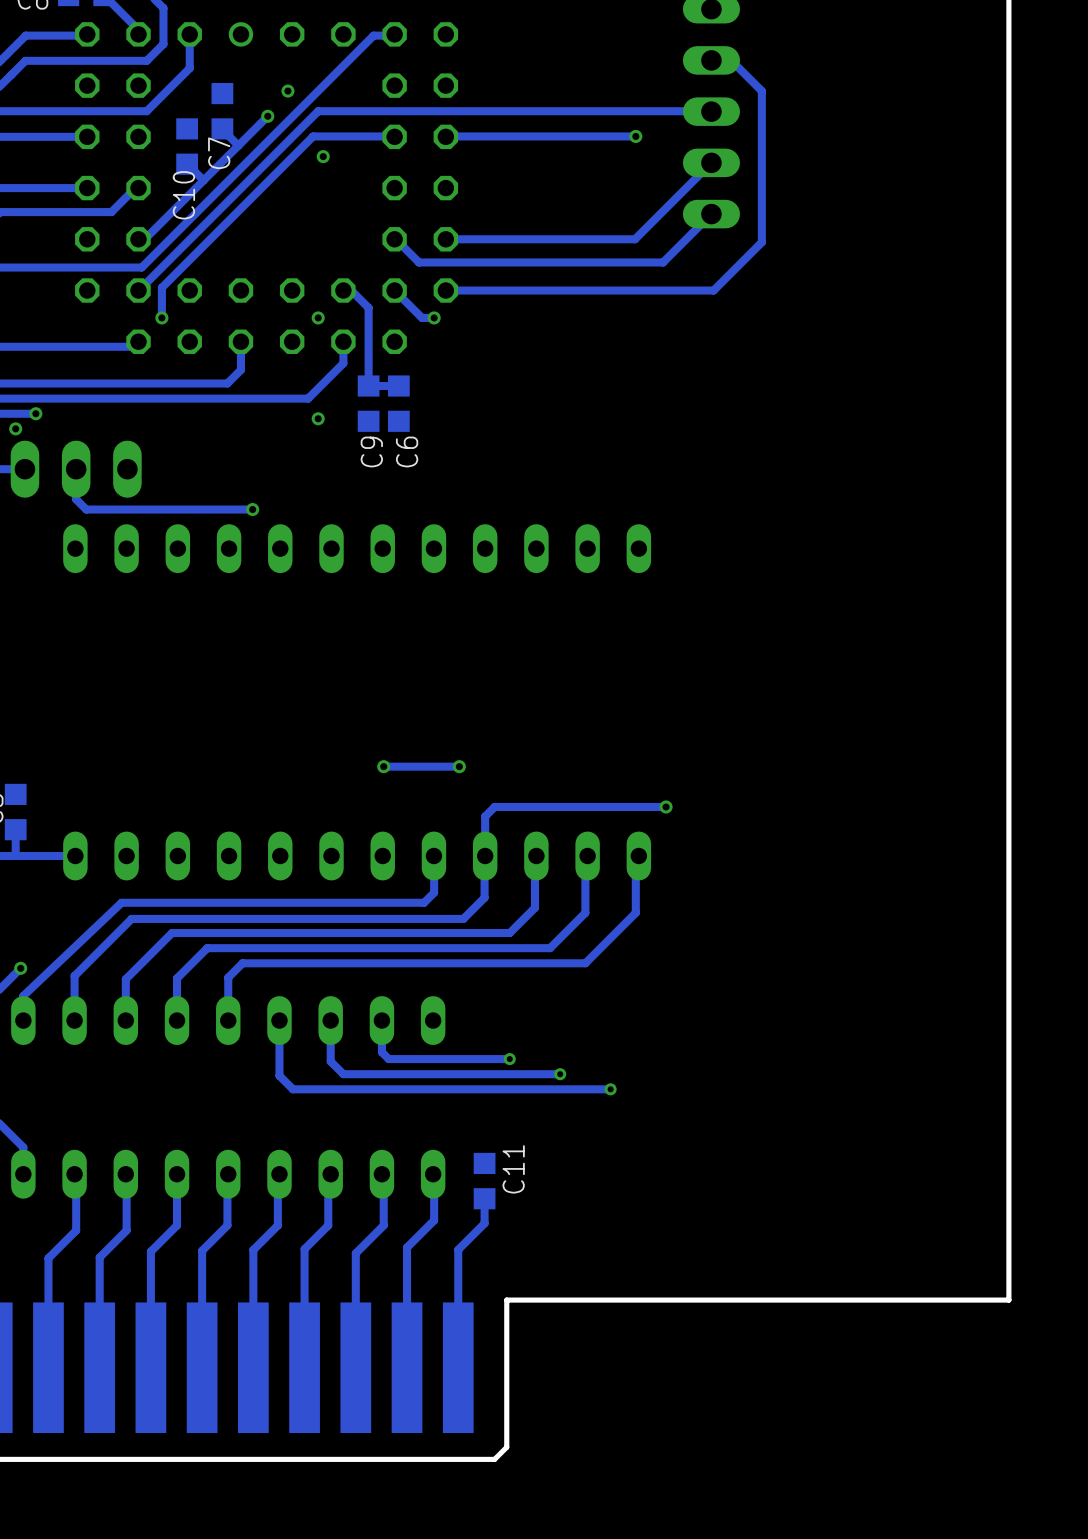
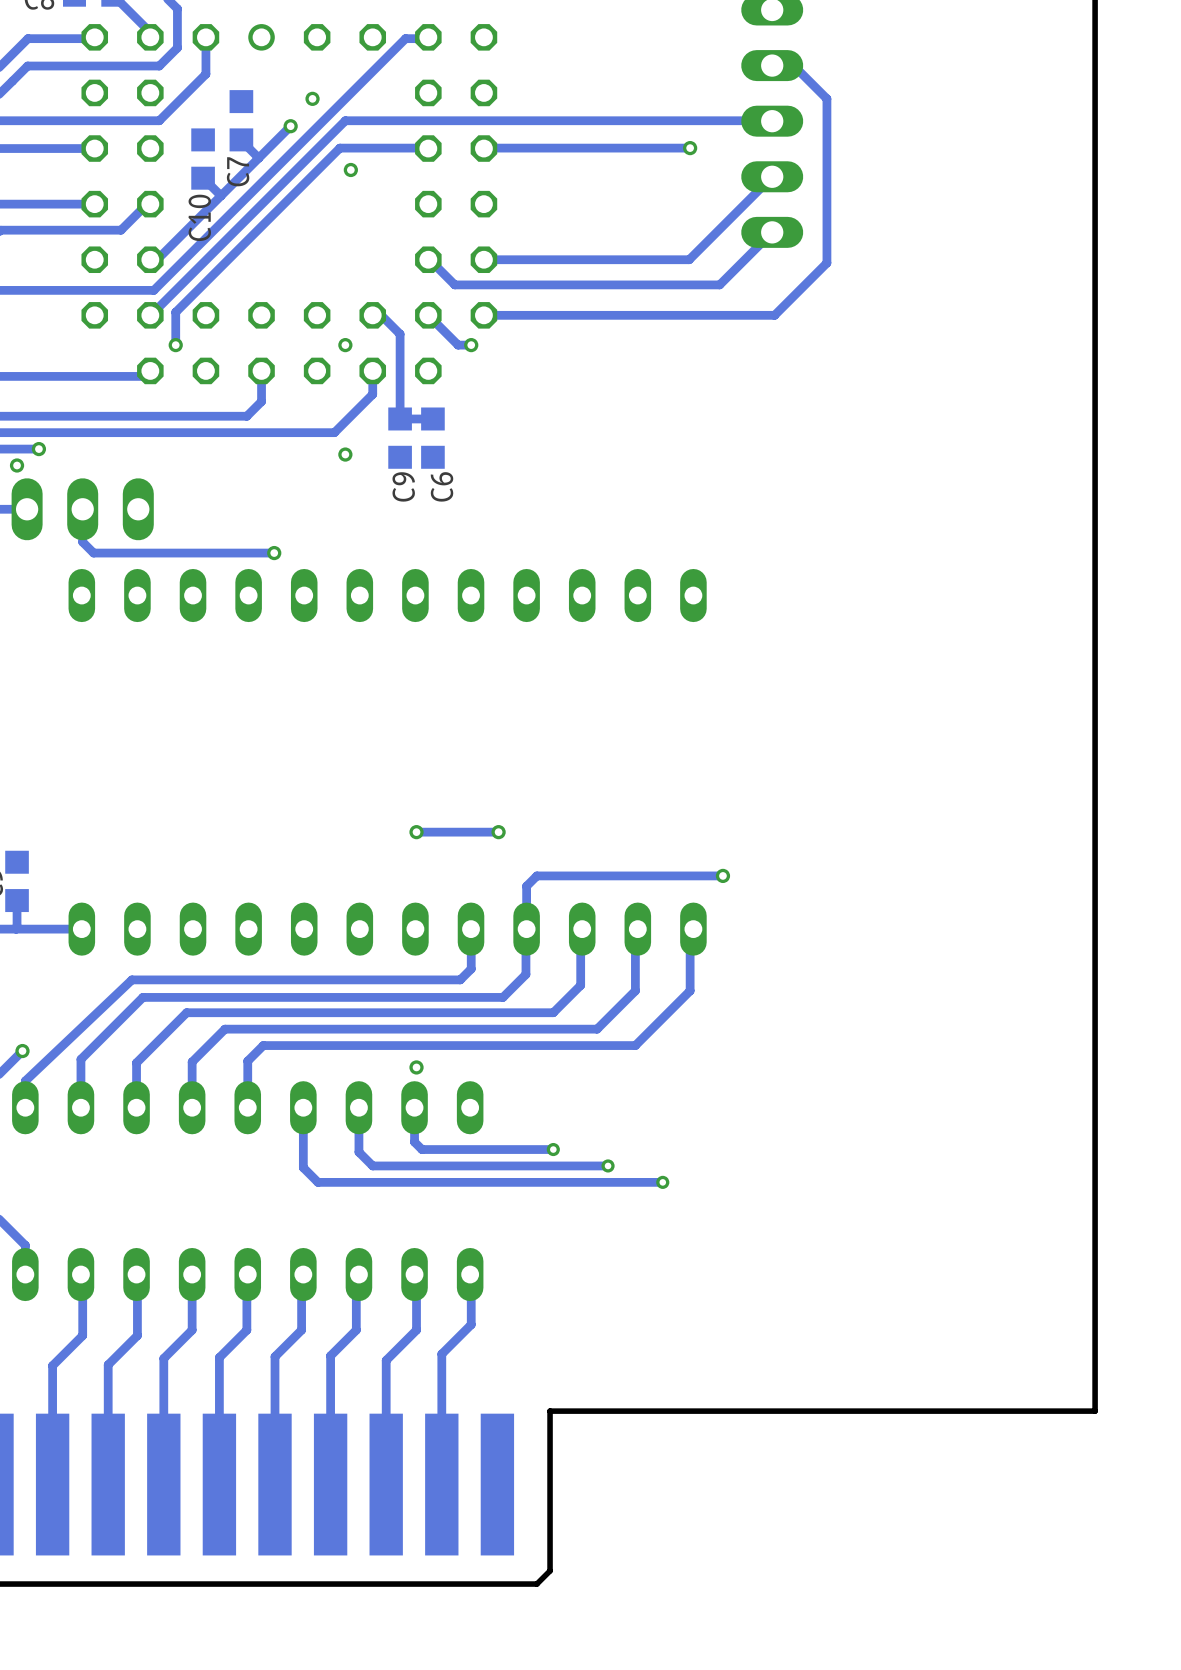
via: none -> (416, 1067)
C11: (484, 1181) -> none
track: (484, 1198) (484, 1223) (458, 1249) (458, 1367) -> none

